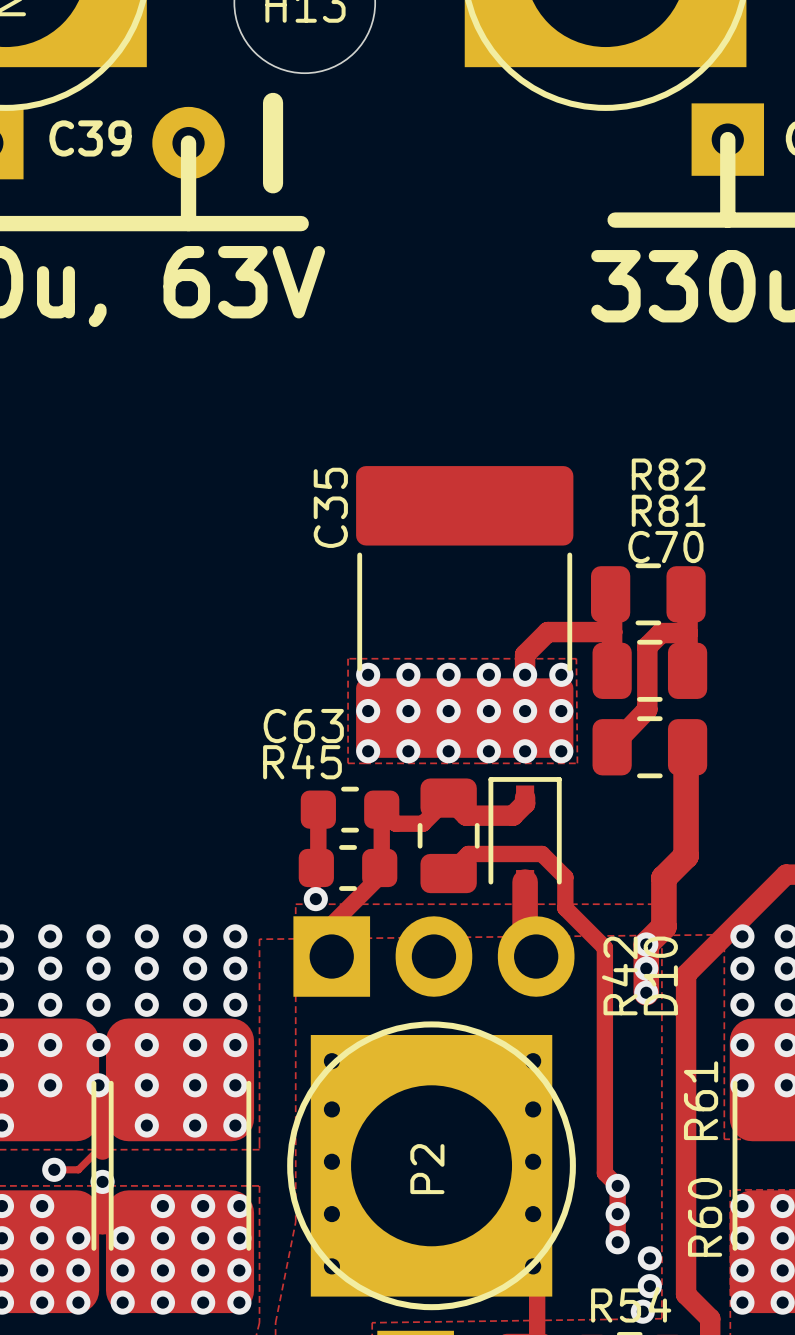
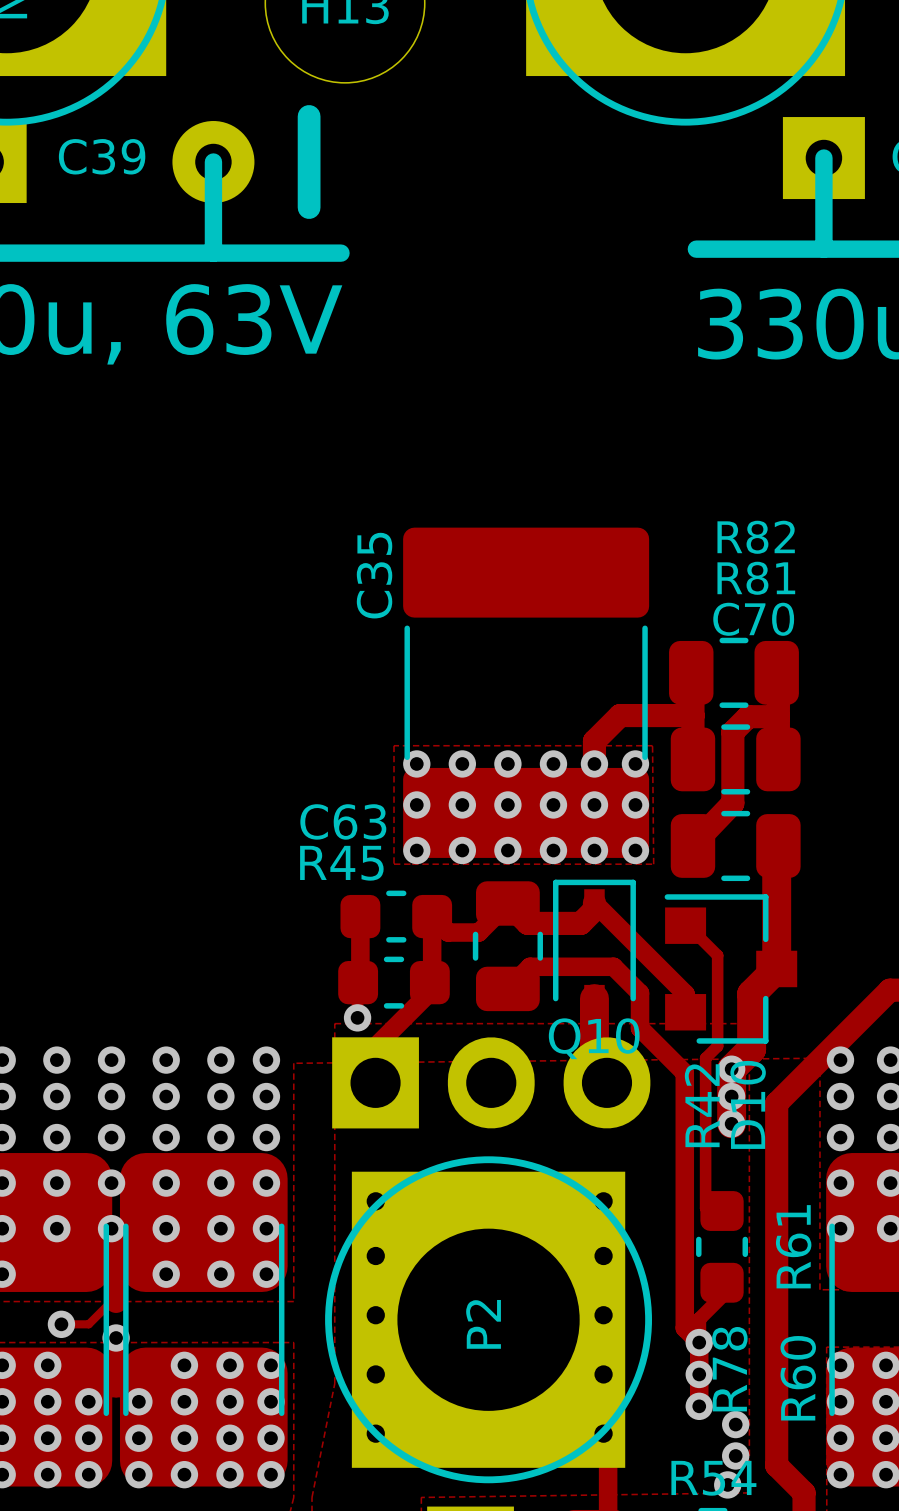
track: none -> (594, 902) (685, 994) (685, 1012)
track: none -> (685, 925) (687, 925) (717, 955) (717, 1046) (705, 1058) (705, 1208) (722, 1224)
Q10: none -> (730, 968)
R78: none -> (722, 1246)
track: none -> (722, 1296) (699, 1319) (699, 1342)

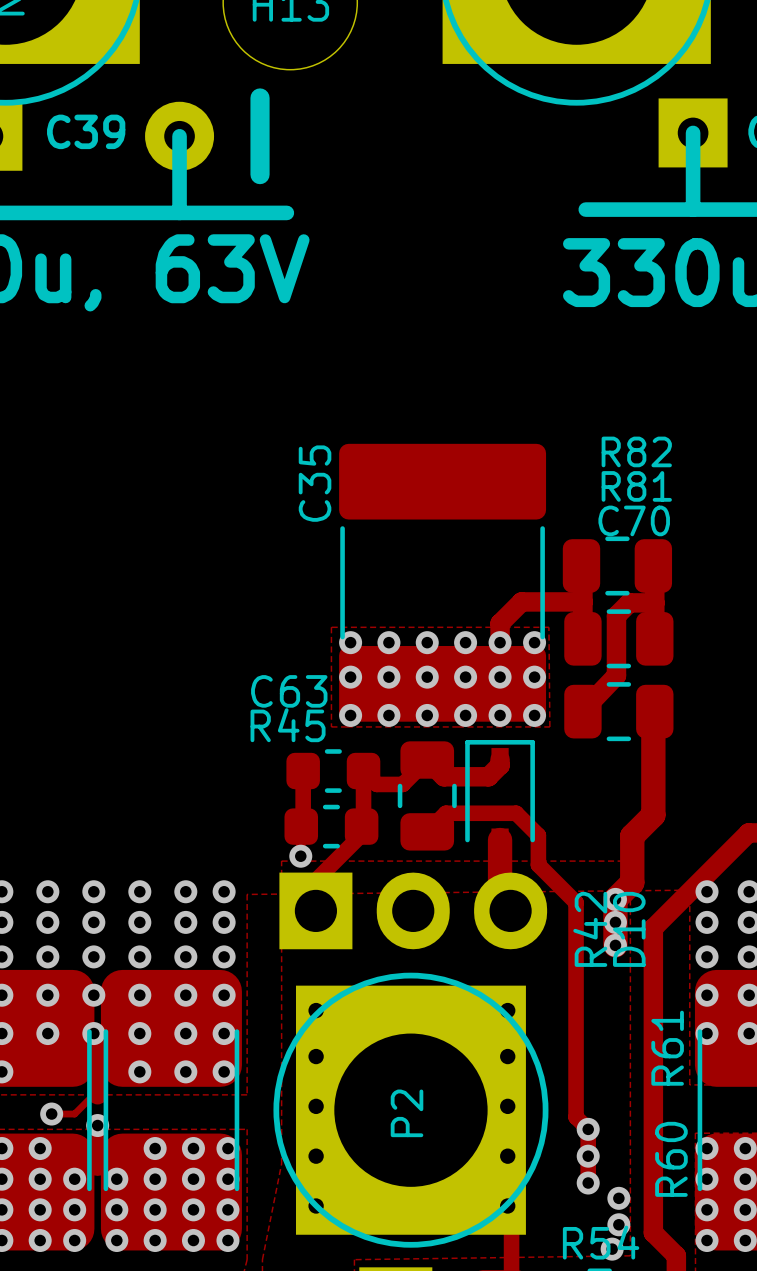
track: (594, 902) (685, 994) (685, 1012) -> none
track: (685, 925) (687, 925) (717, 955) (717, 1046) (705, 1058) (705, 1208) (722, 1224) -> none
Q10: (730, 968) -> none
R78: (722, 1246) -> none
track: (722, 1296) (699, 1319) (699, 1342) -> none

